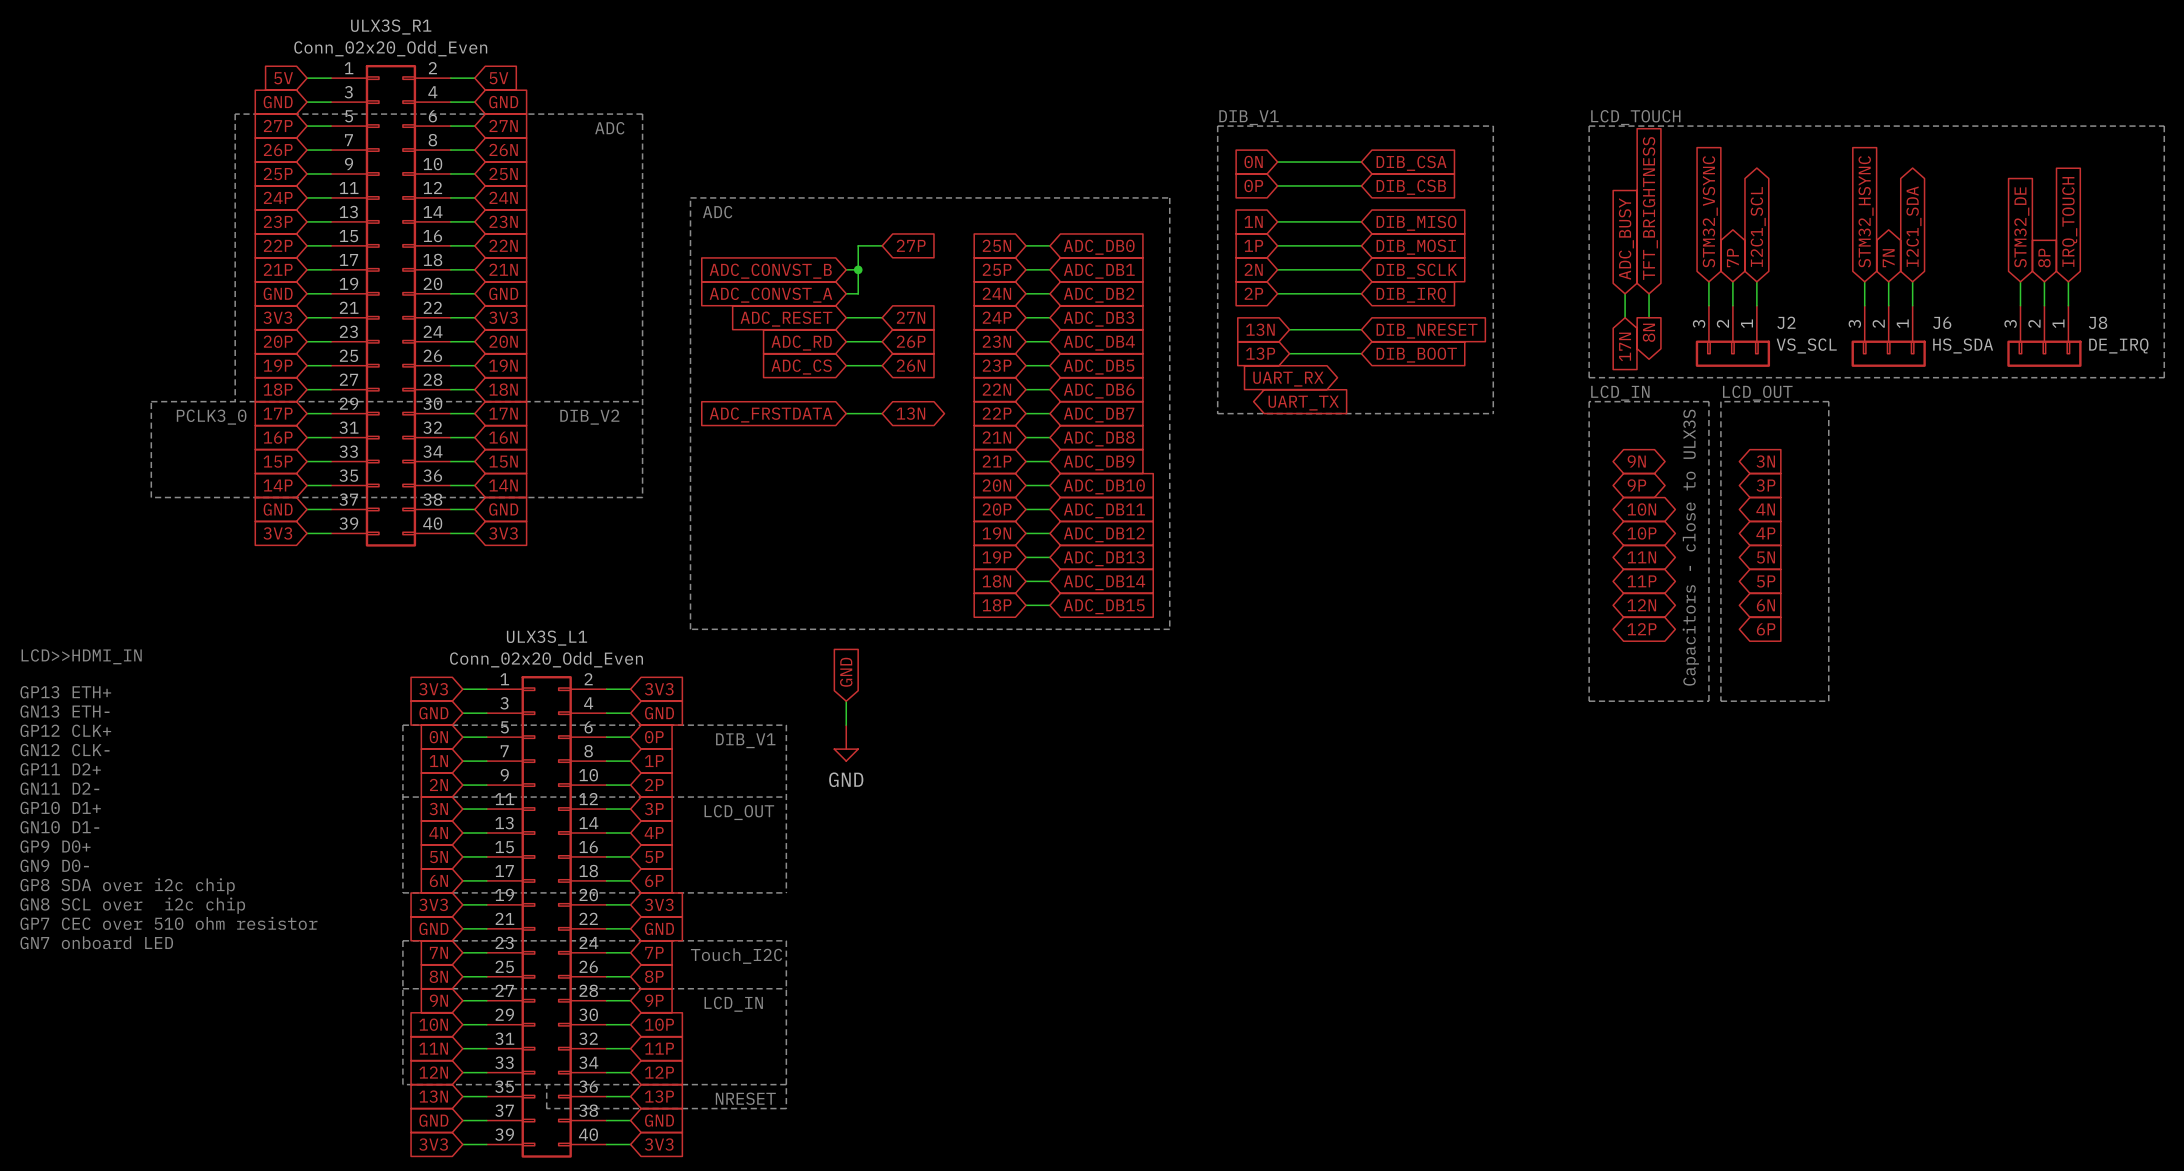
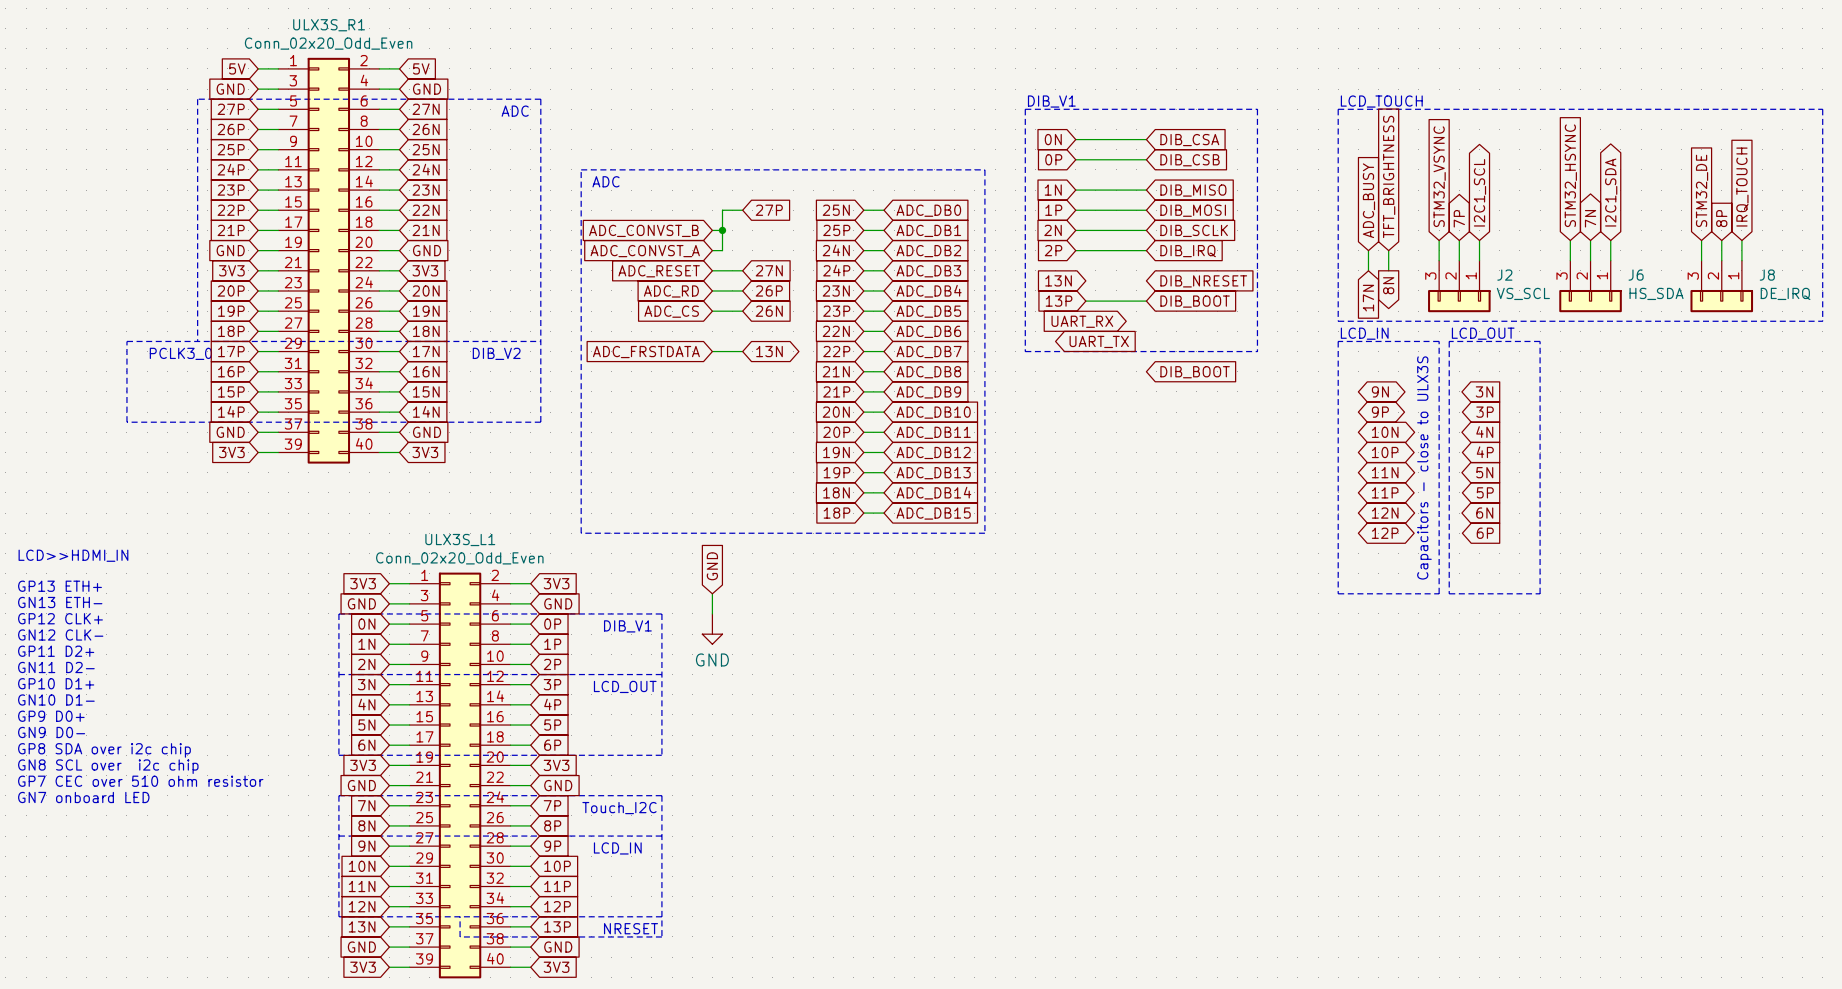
wire: (1289, 329) (1361, 329) -> none
global label: none -> DIB_BOOT (1195, 372)

